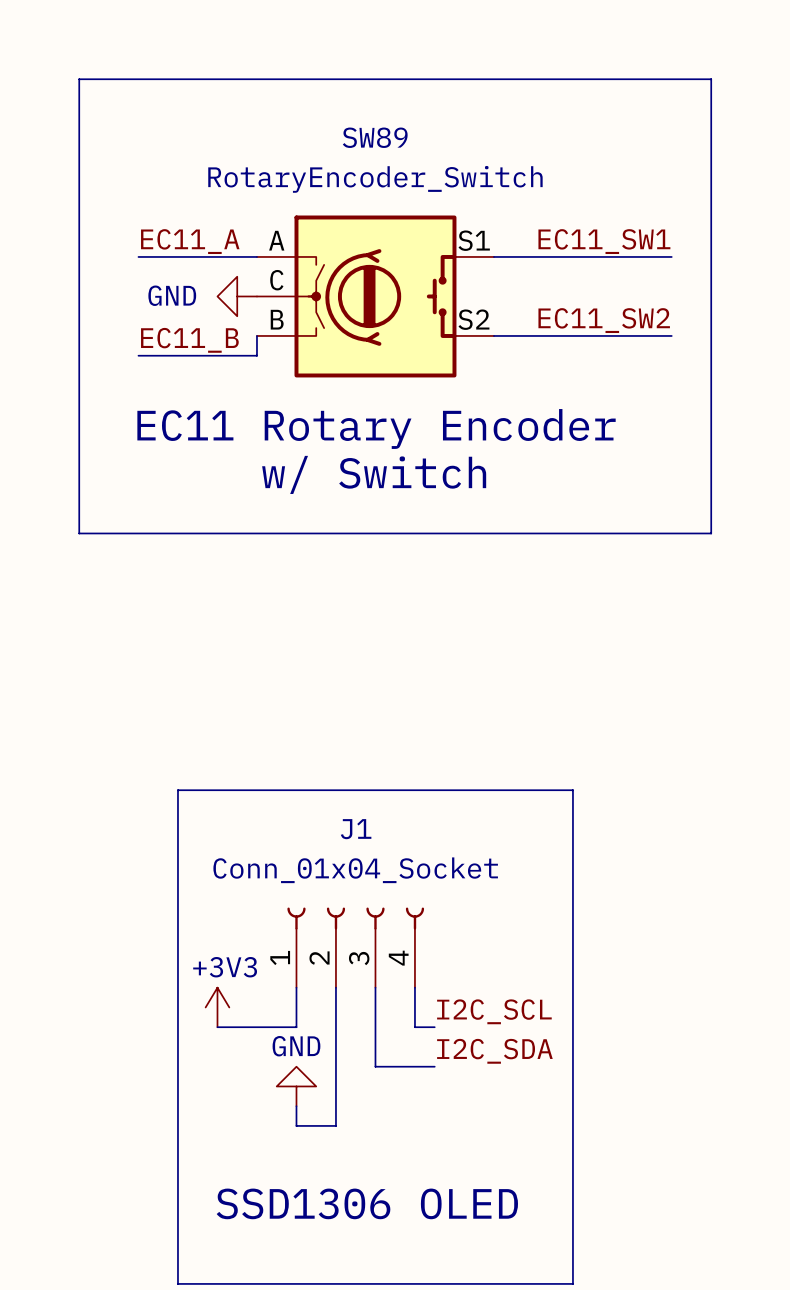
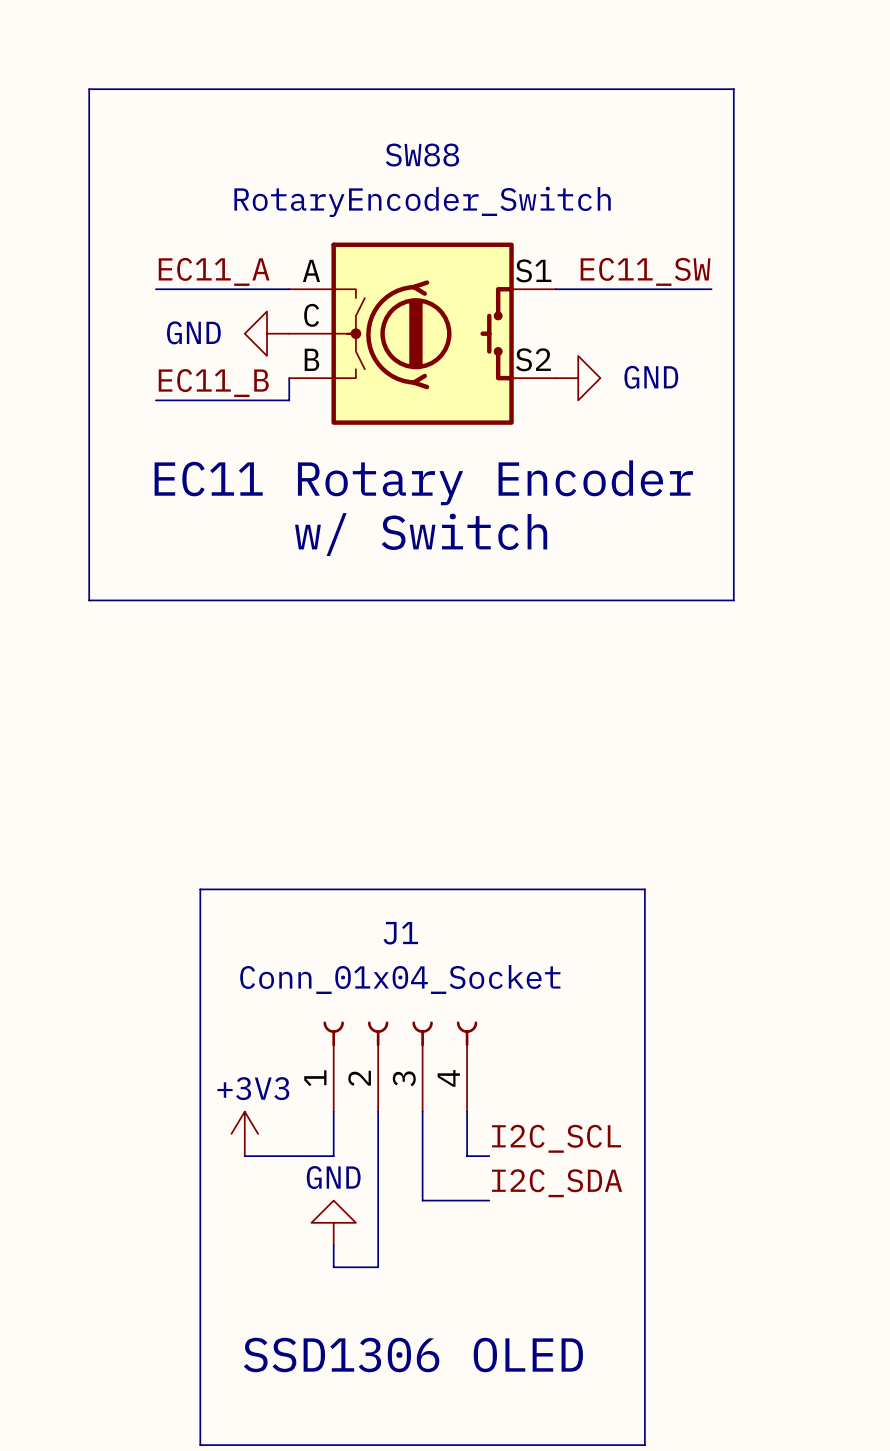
line: (651, 79) (711, 79) (711, 533) (651, 533) -> (733, 89) (733, 600)
SW89 name: SW89 (375, 137) -> SW88 (422, 155)
label: EC11_SW1 (604, 241) -> EC11_SW (645, 271)
wire: (632, 256) (671, 256) -> none
label: EC11_SW2 (604, 320) -> none
wire: (493, 335) (671, 335) -> none
power symbol: none -> GND (578, 378)

